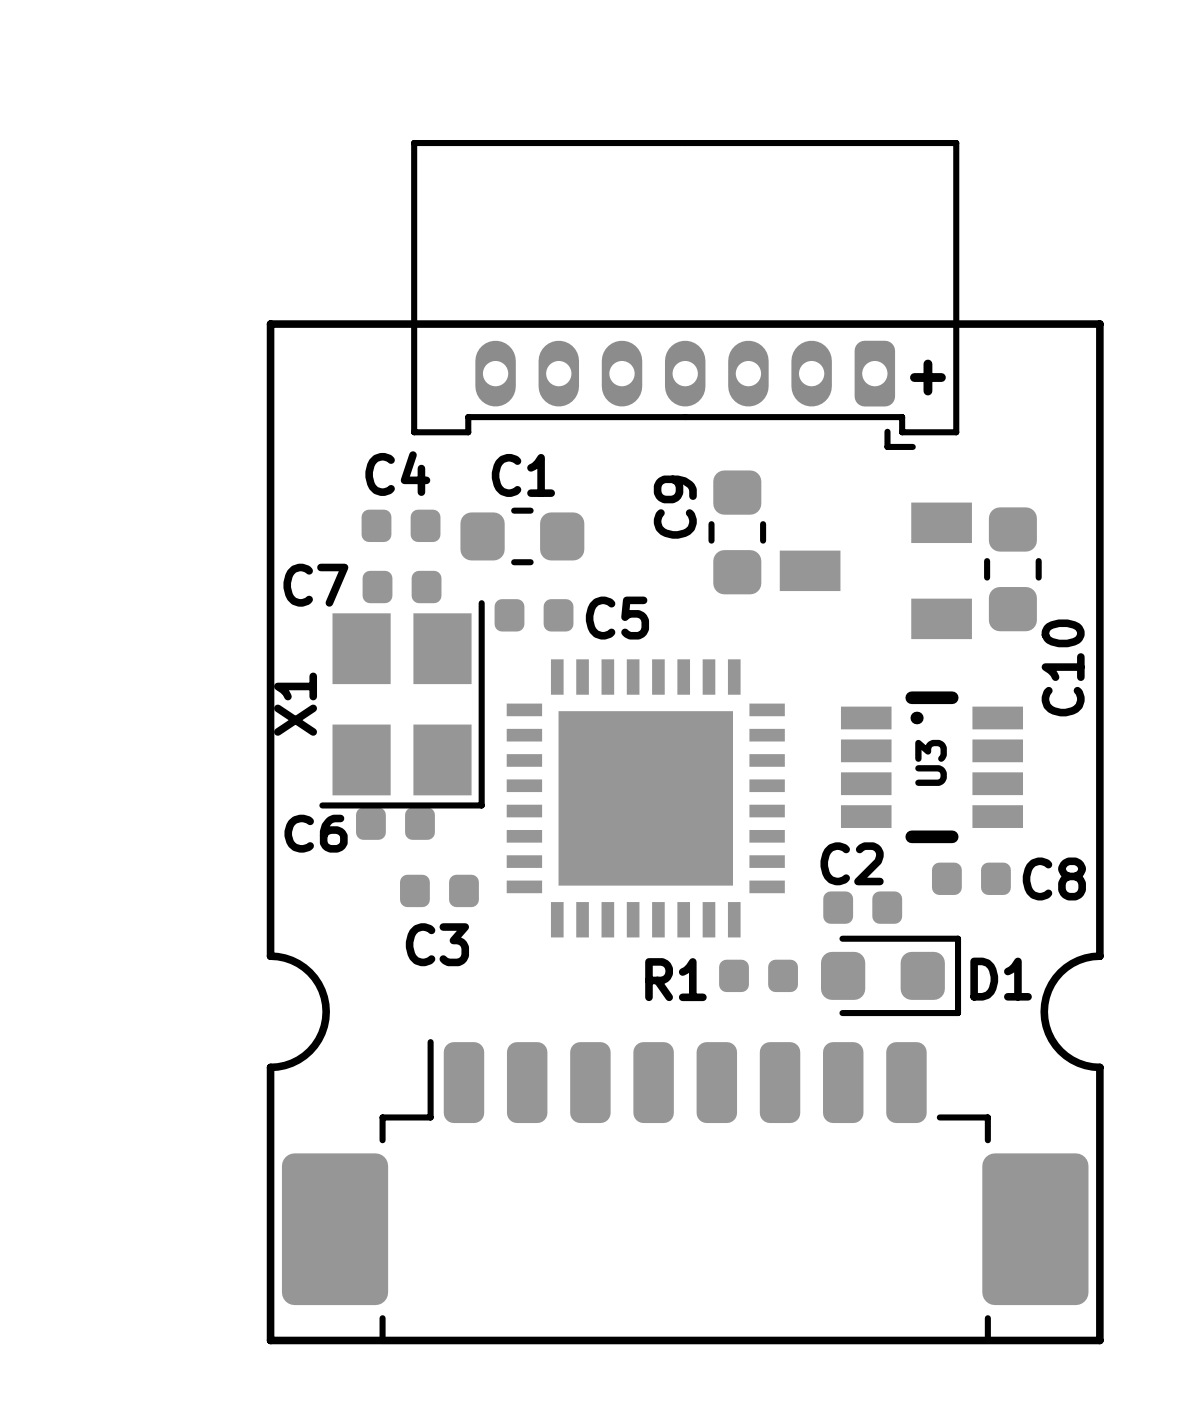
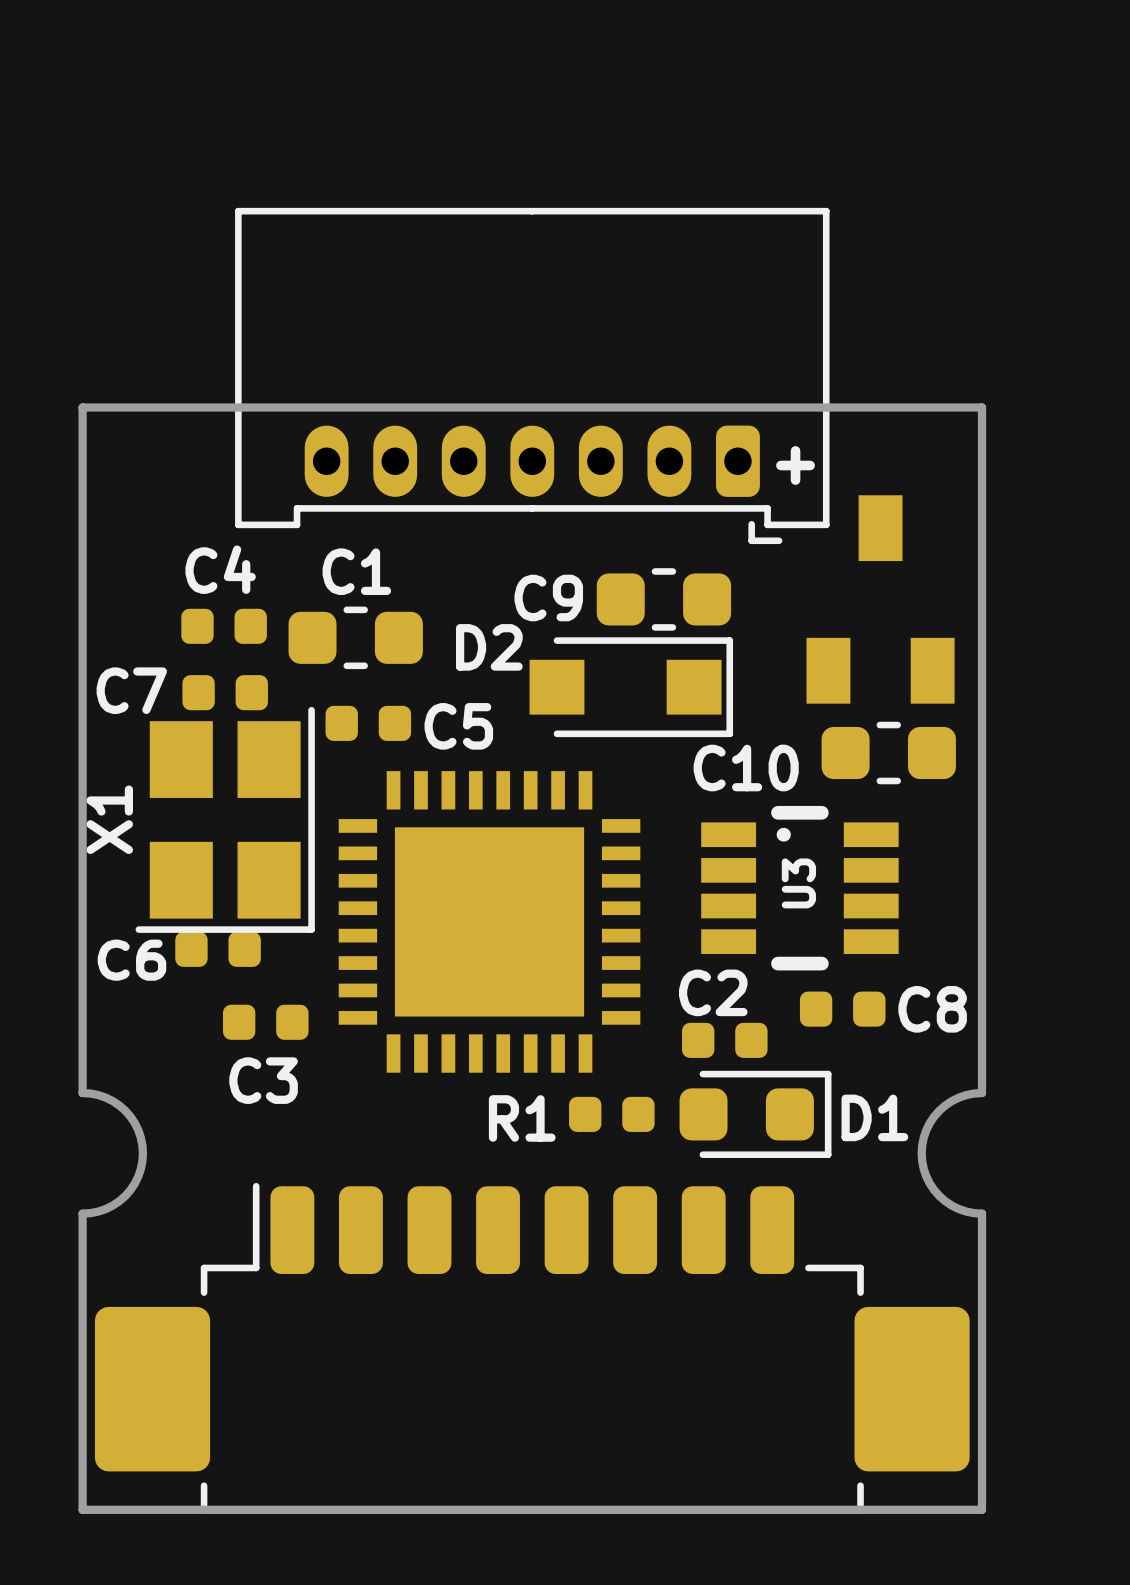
C9 rotation: 0° (737, 532) -> 90° clockwise (663, 599)
C9 position: (737, 532) -> (663, 599)
C10 rotation: 0° (1012, 569) -> 90° clockwise (888, 753)
part rotation: 0° (875, 570) -> 90° clockwise (880, 599)
part position: (875, 570) -> (880, 599)
D2: none -> (631, 687)

